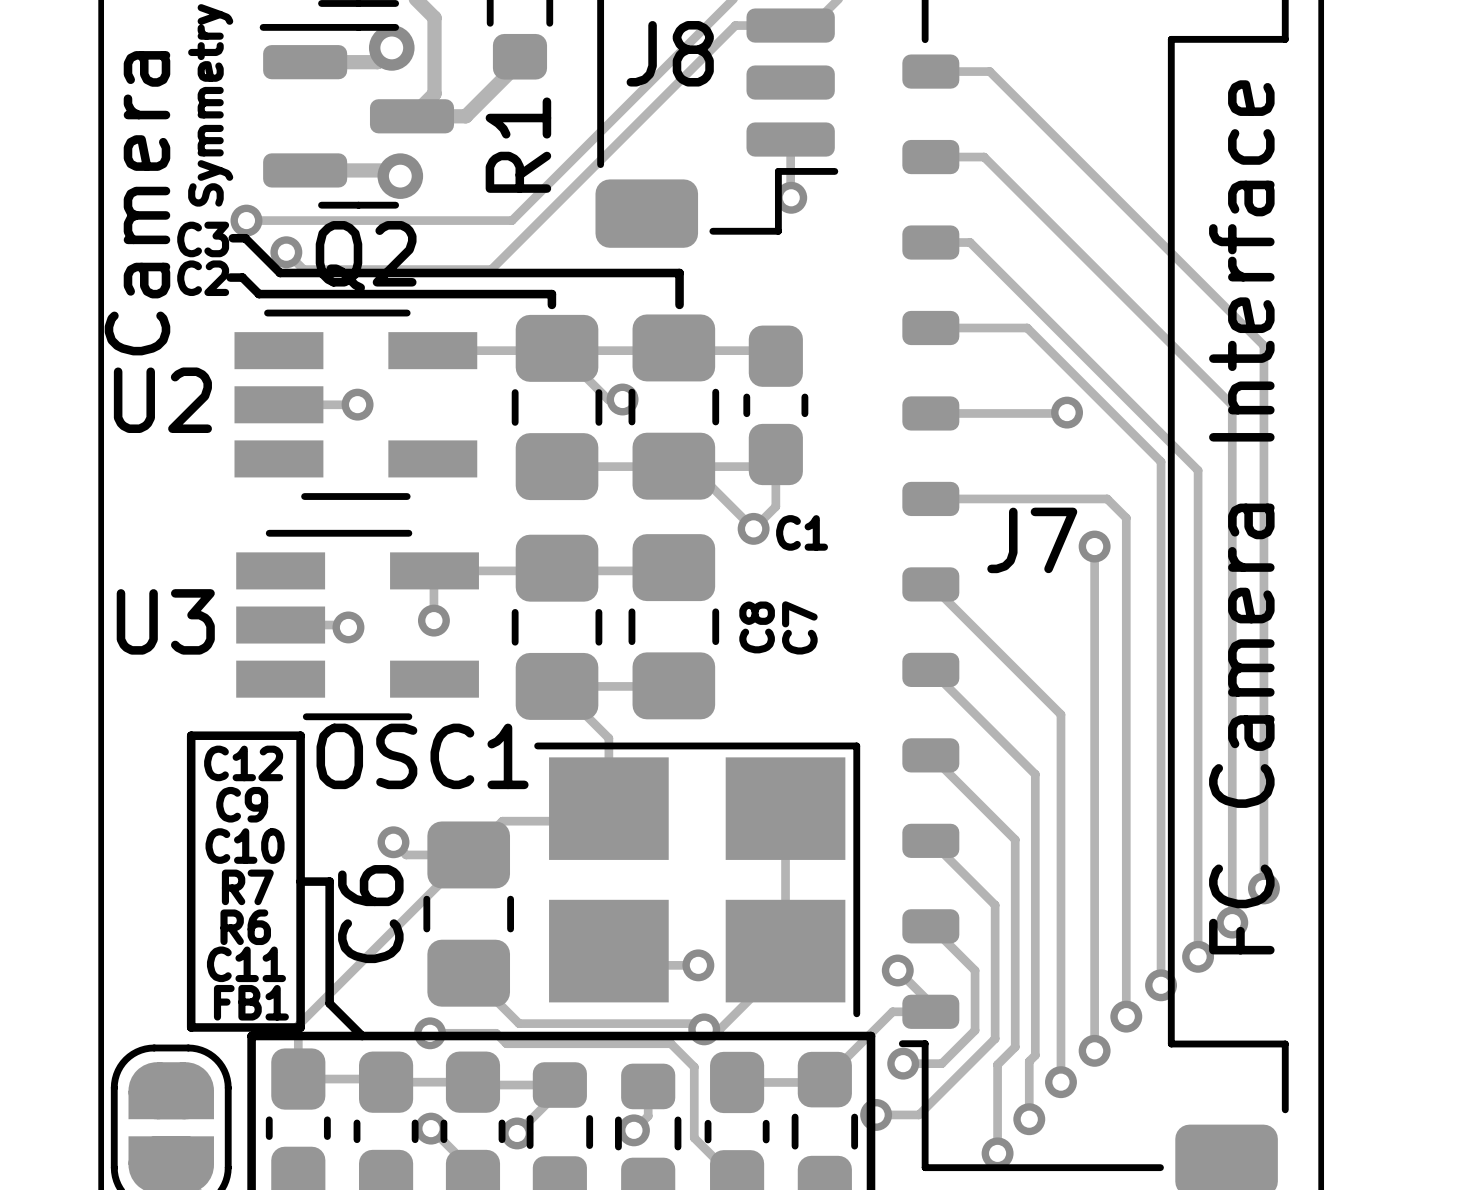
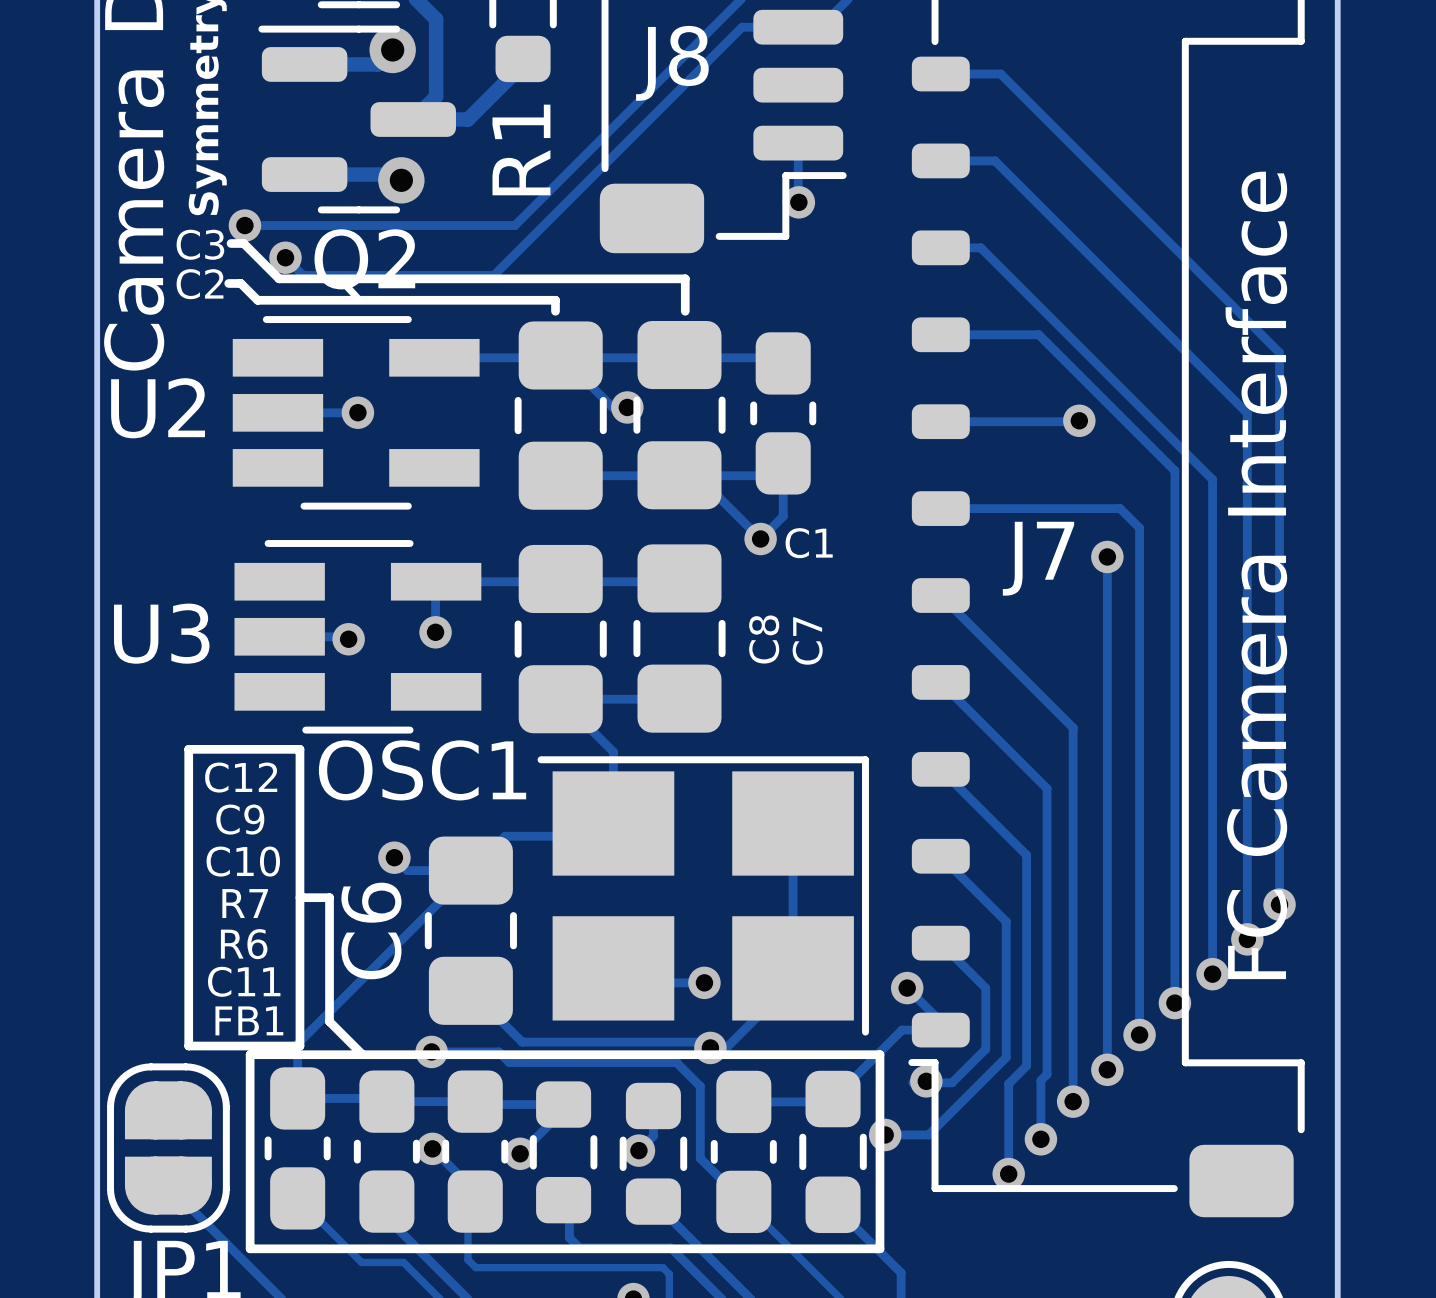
via position: (903, 1063) -> (926, 1081)

